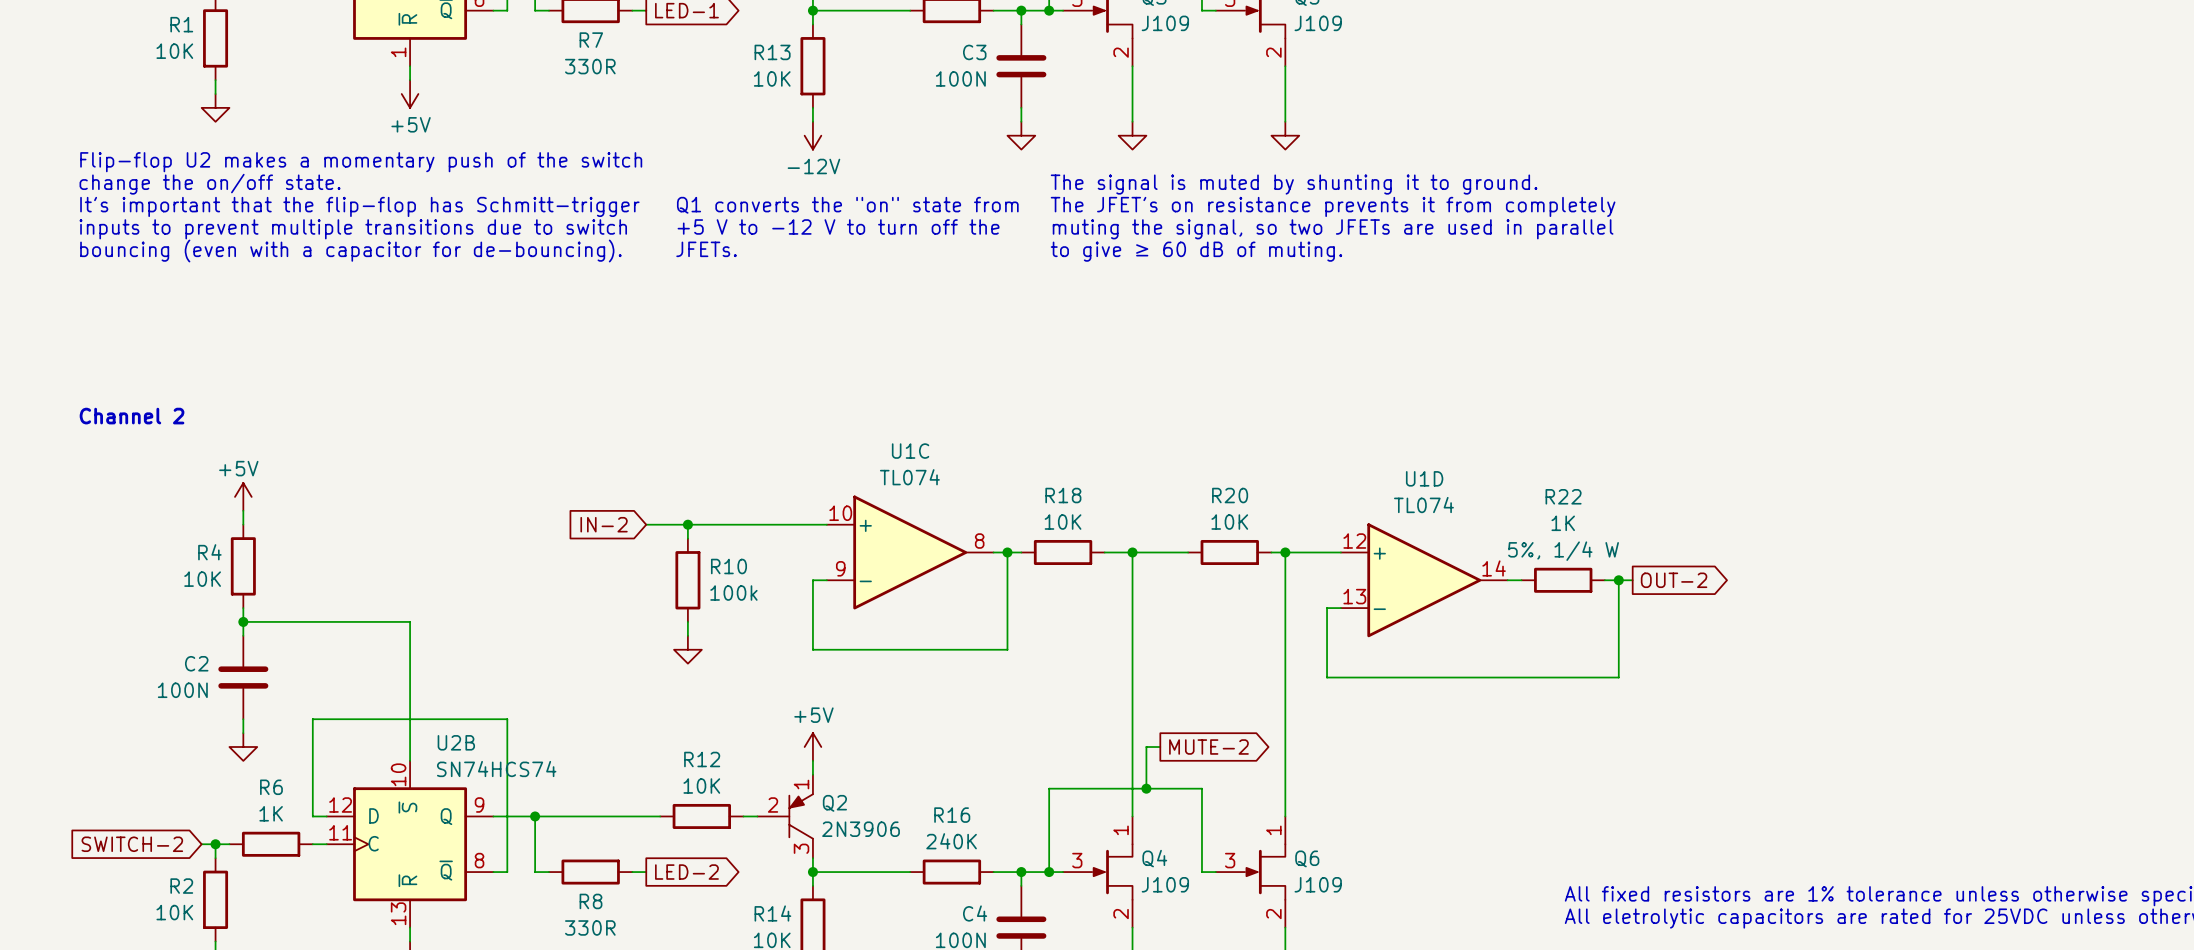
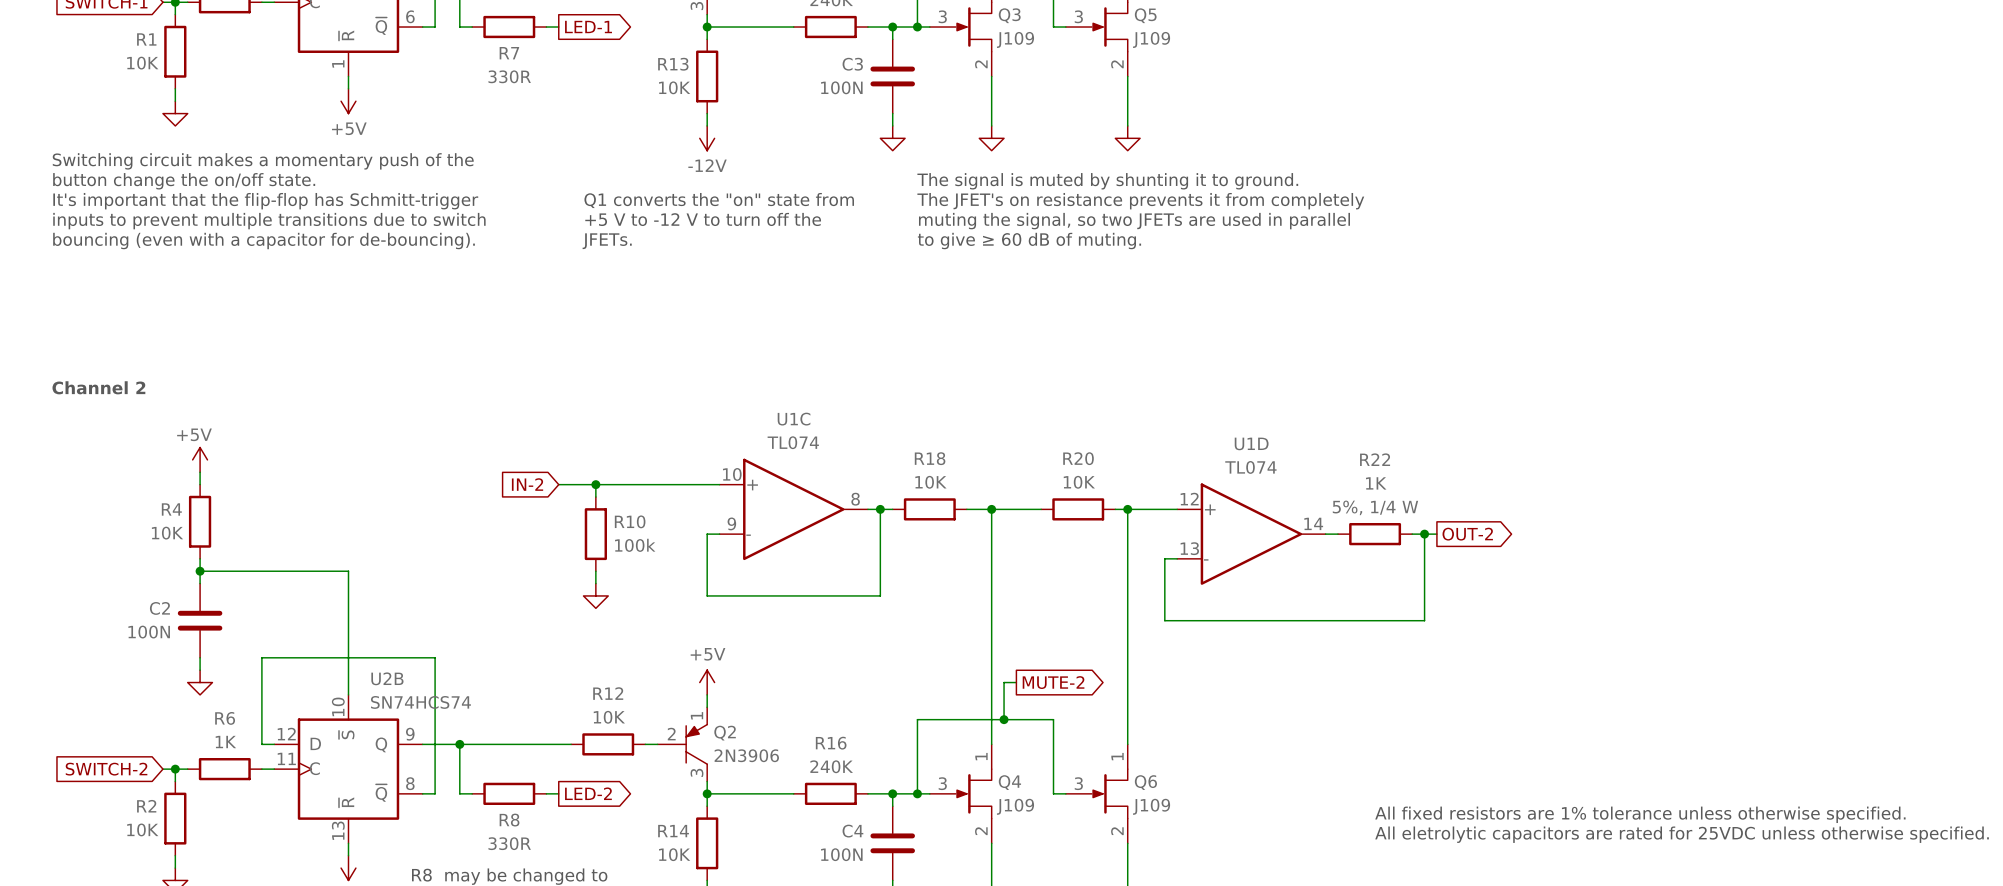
text: Flip-flop U2 makes a momentary push of the switch (361, 162) -> Switching circuit makes a momentary push of the (263, 161)
text: change the on/off state. (210, 184) -> button change the on/off state. (184, 181)

